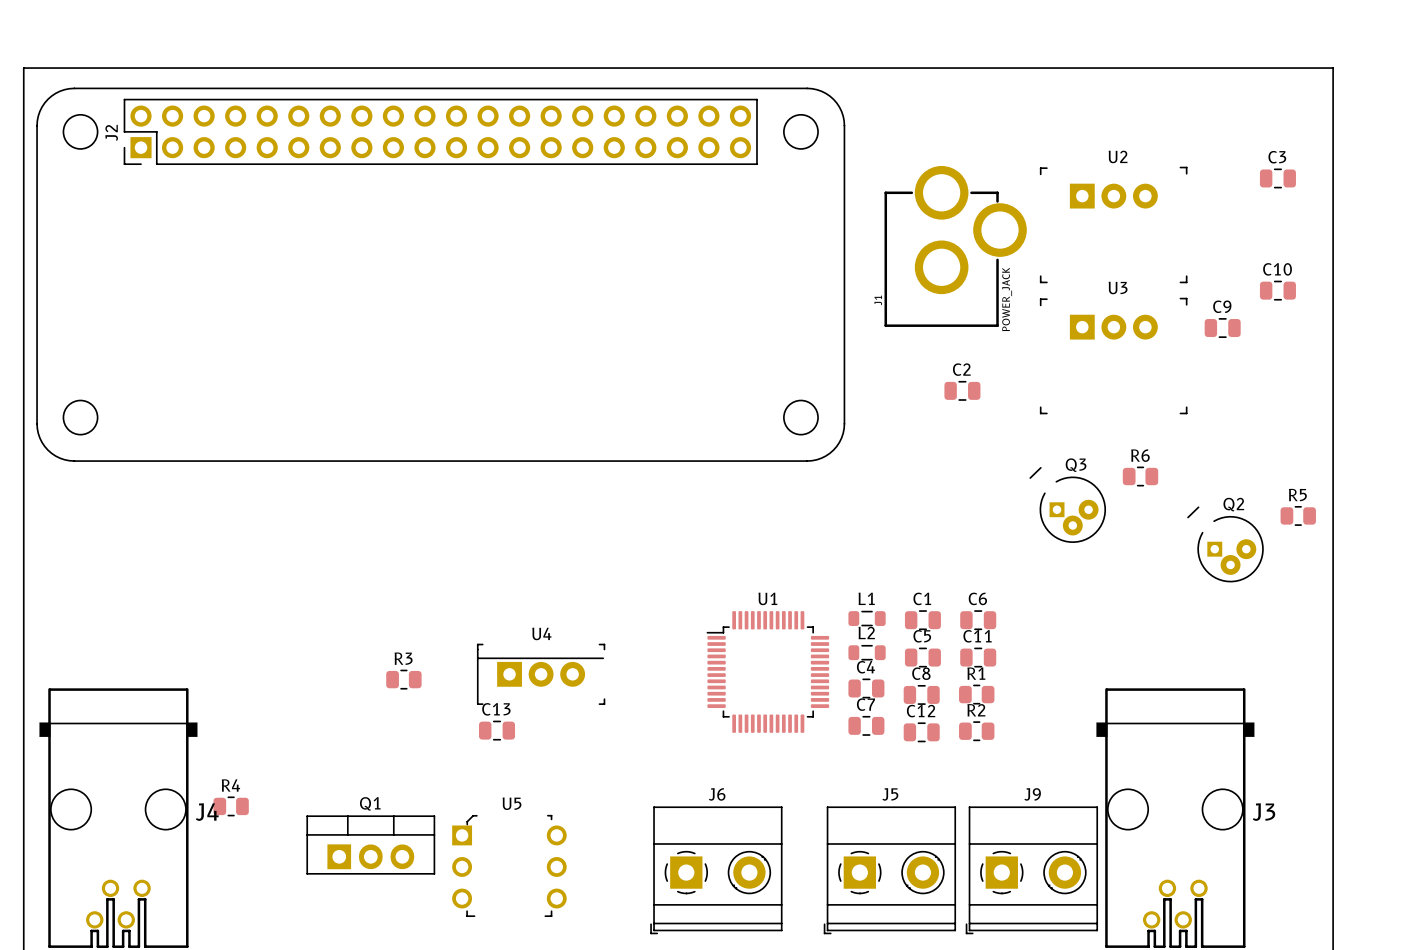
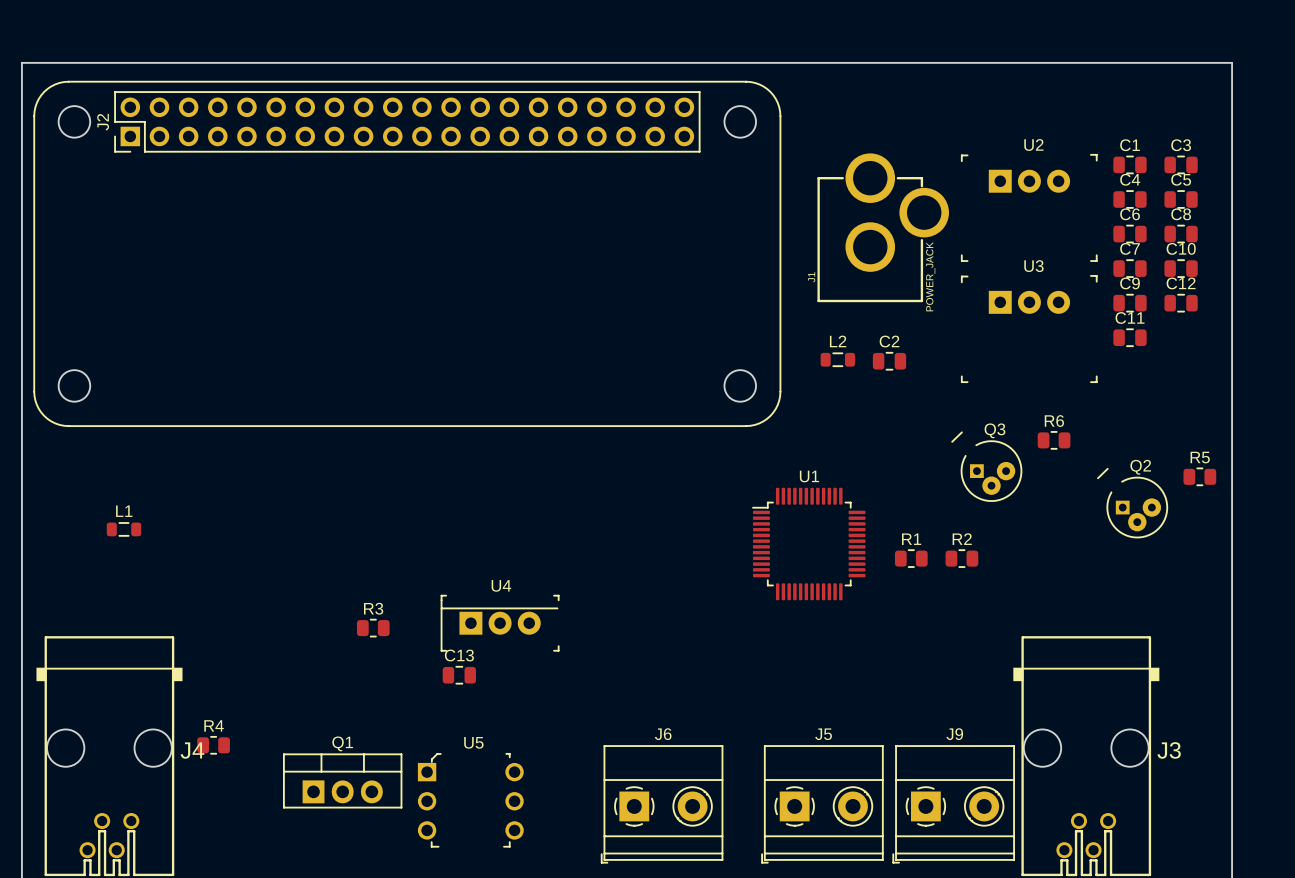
L1 position: (867, 618) -> (124, 529)
C1 position: (922, 620) -> (1130, 164)
C6 position: (978, 620) -> (1130, 234)
L2 position: (867, 652) -> (837, 359)
C5 position: (922, 657) -> (1181, 199)
C11 position: (978, 657) -> (1130, 337)
U1 position: (767, 671) -> (808, 544)
C4 position: (866, 688) -> (1130, 199)
C8 position: (921, 694) -> (1181, 234)
R1 position: (976, 694) -> (911, 558)
C7 position: (866, 725) -> (1130, 268)
R2 position: (976, 731) -> (961, 558)
C12 position: (921, 732) -> (1181, 303)

